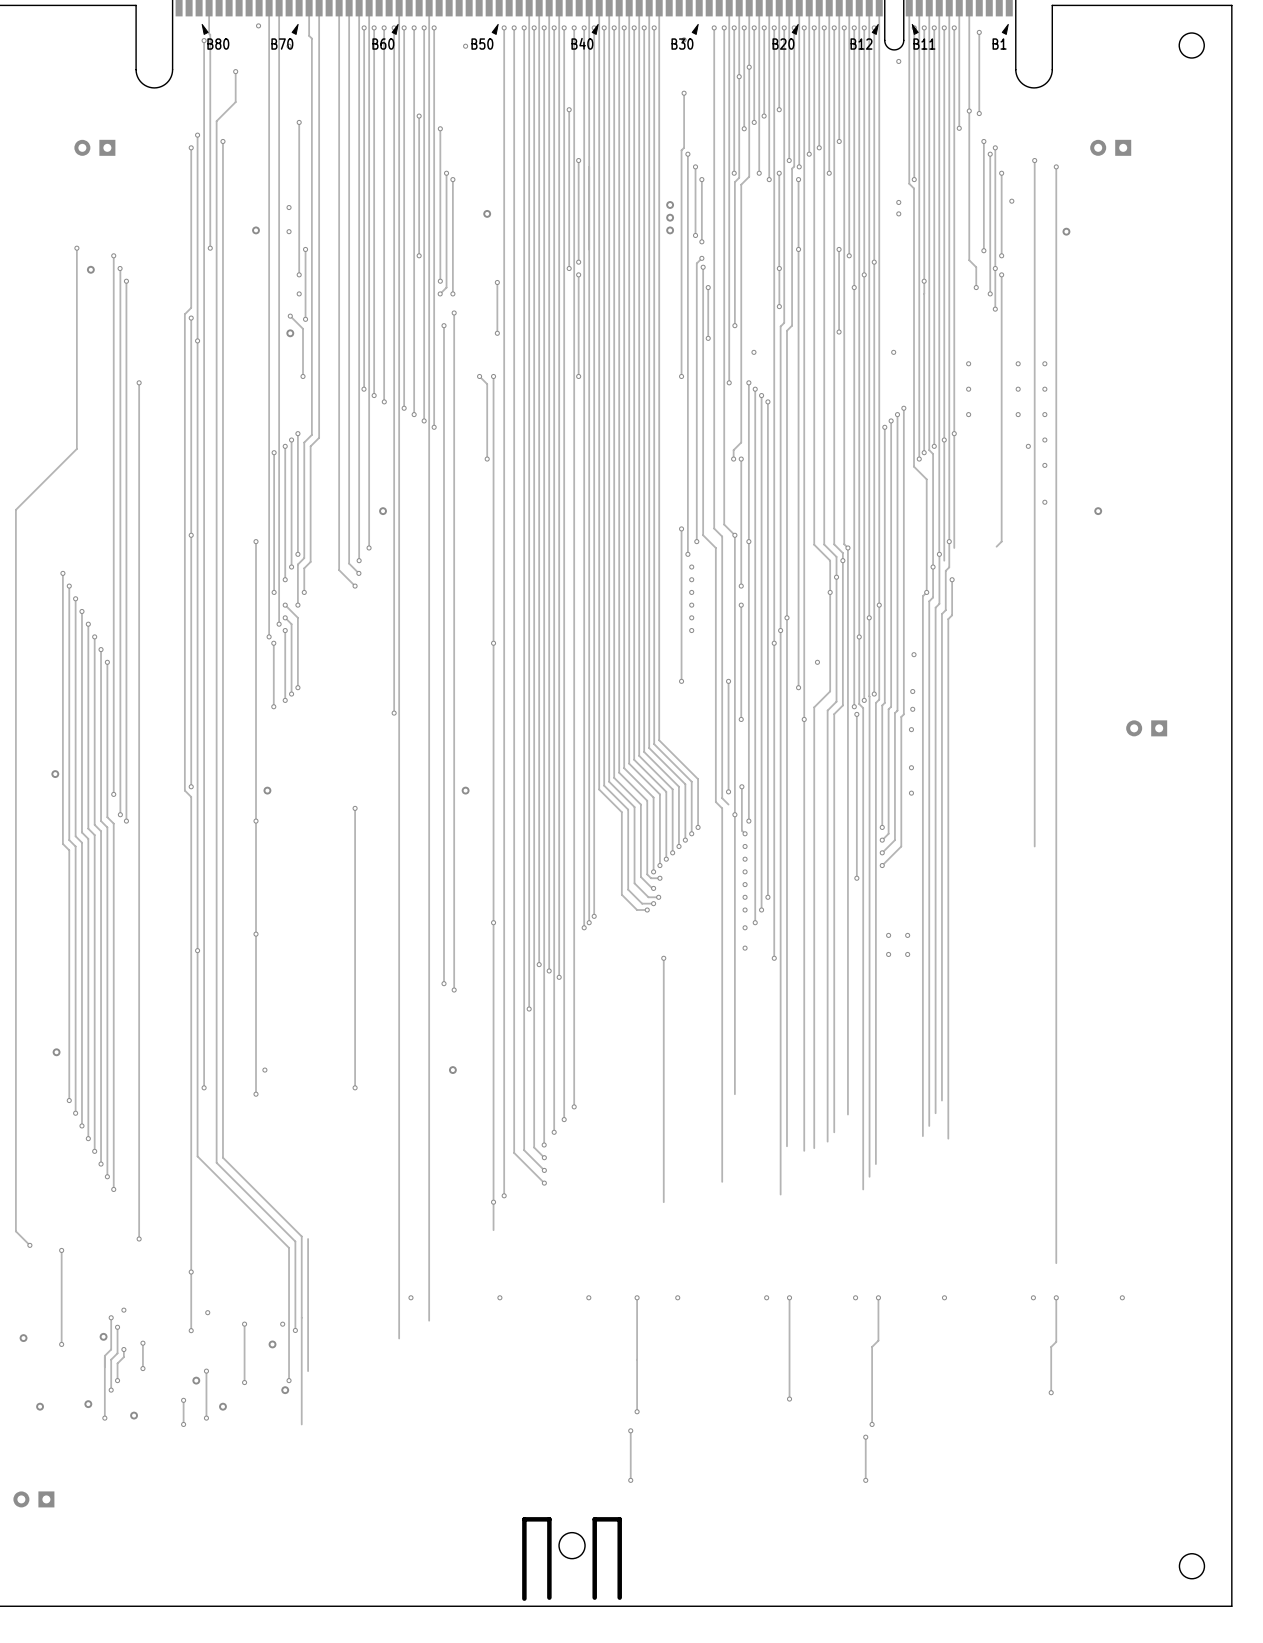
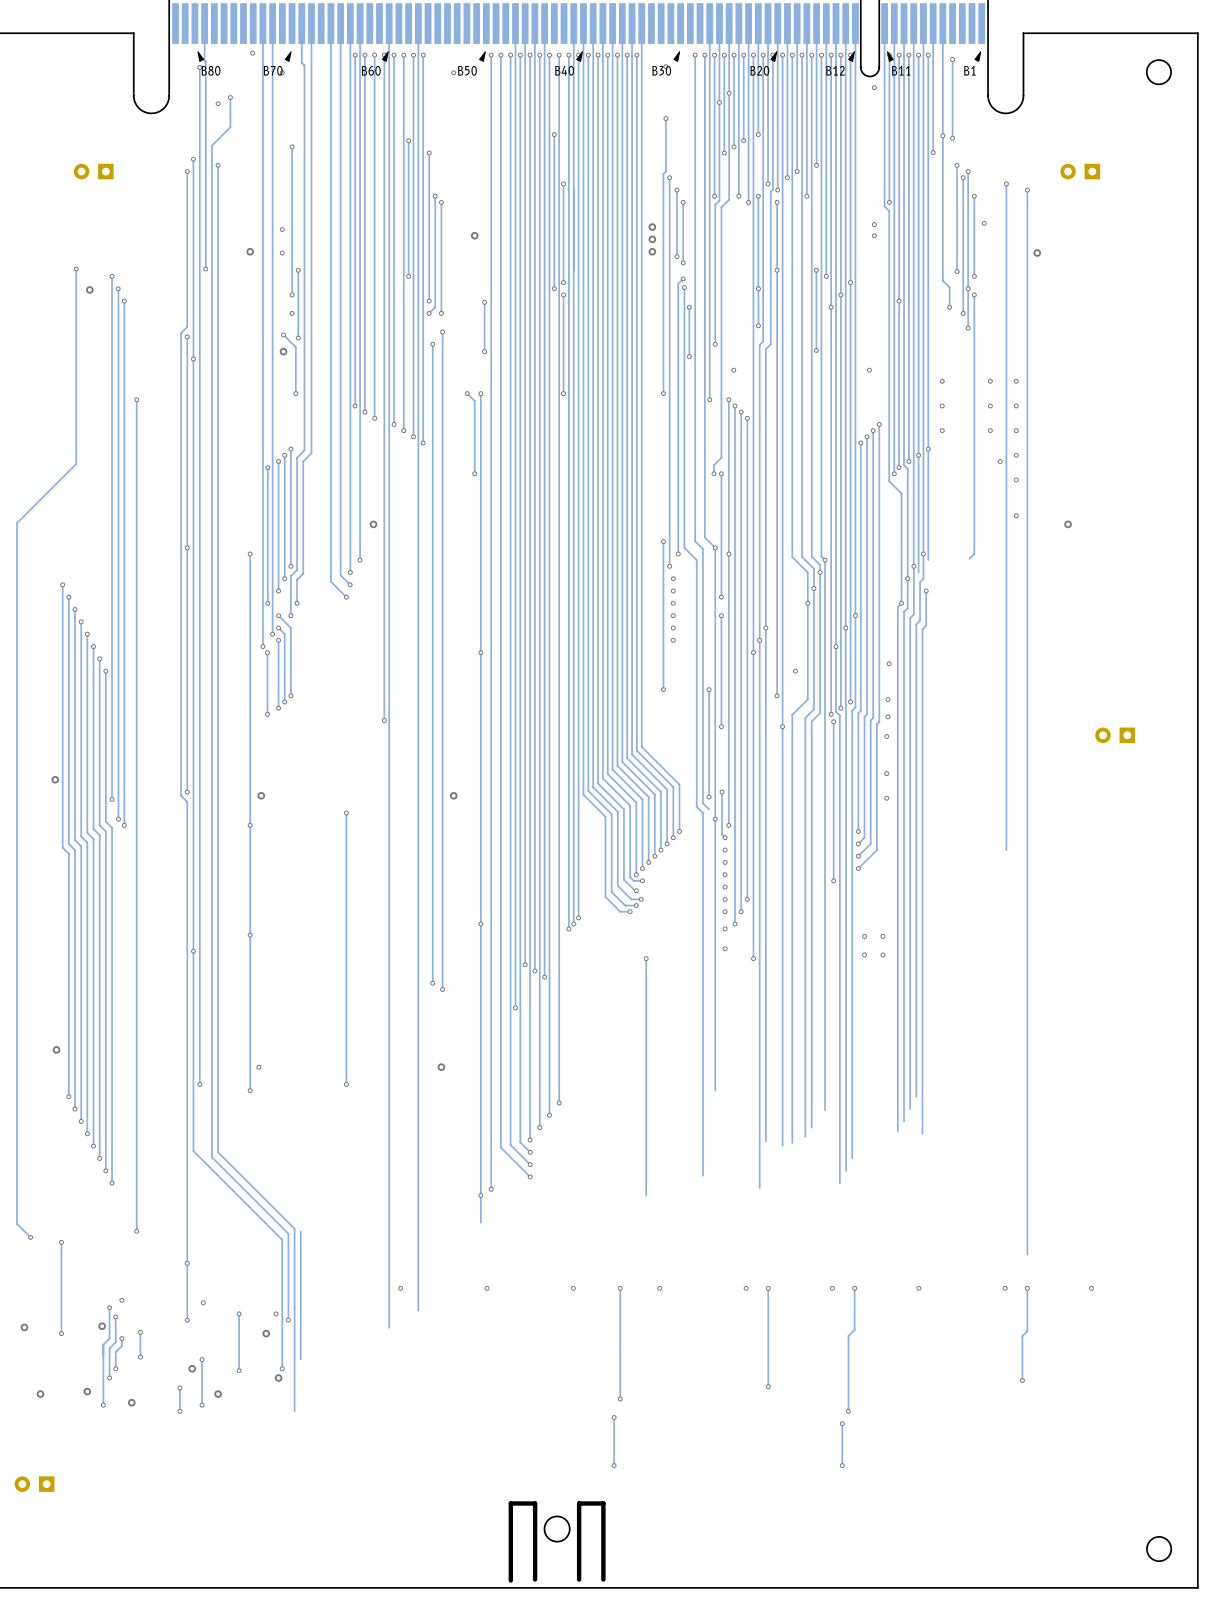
via: none -> (218, 103)

